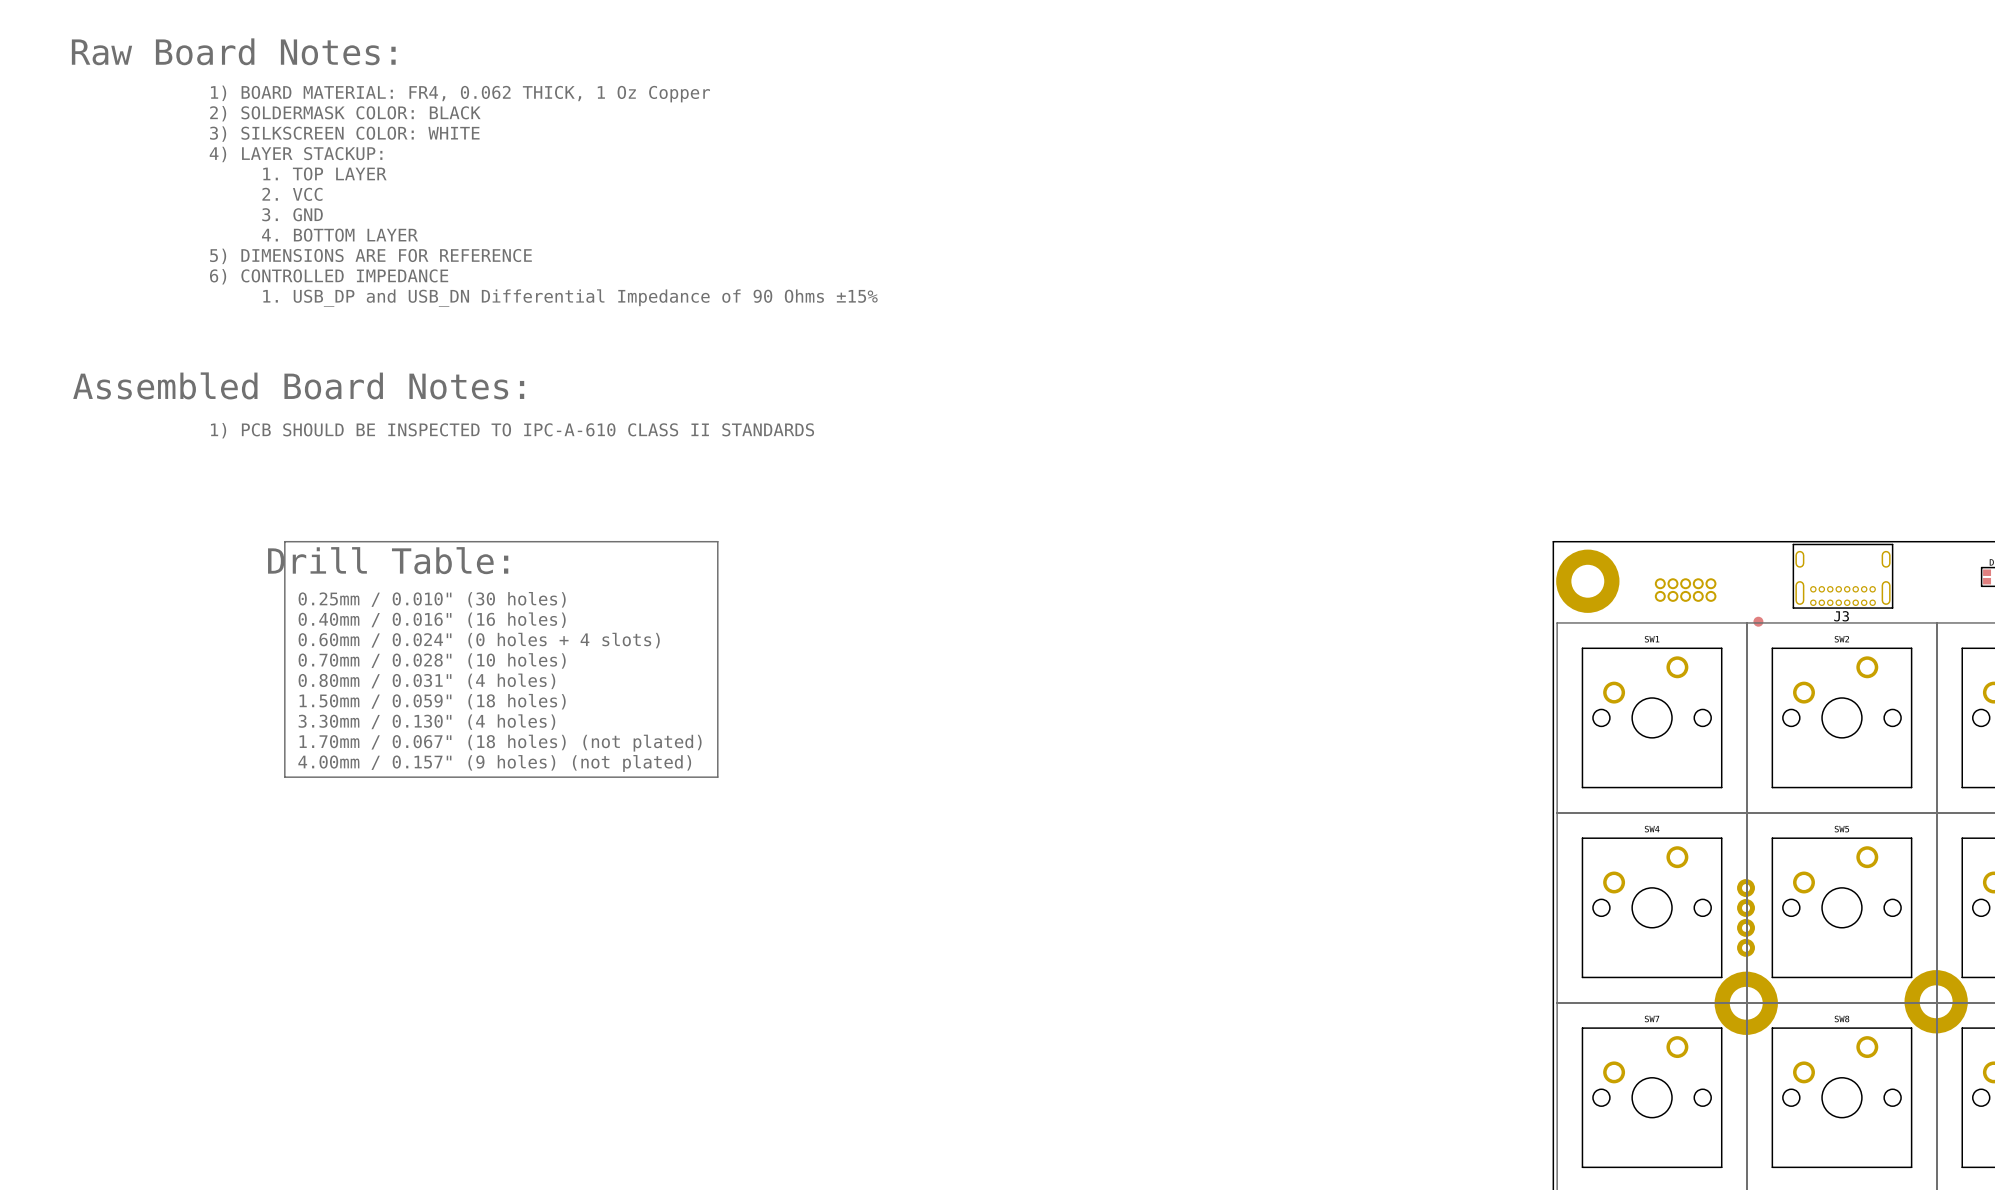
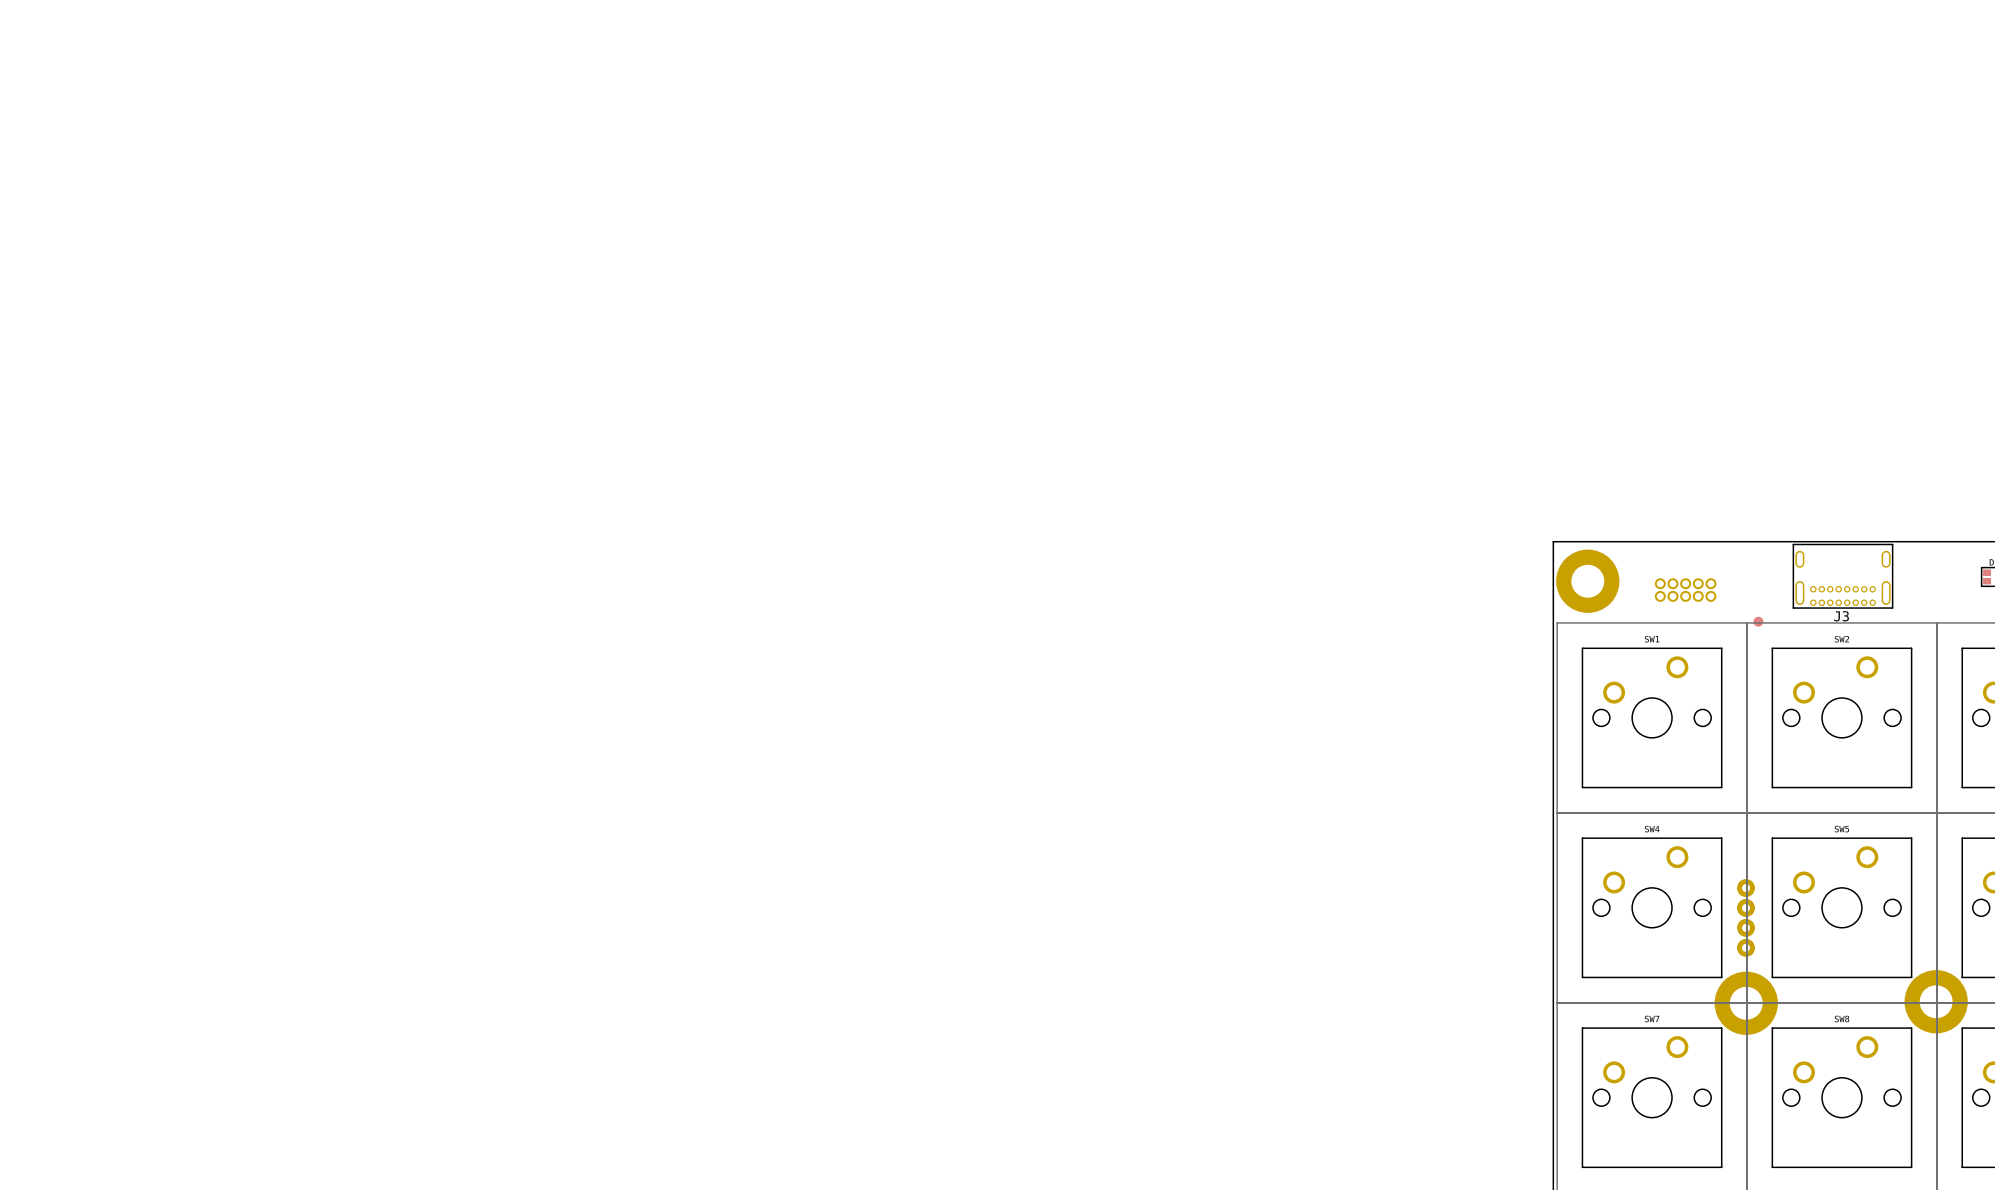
text: Raw Board Notes: (233, 51) -> none
text: 1) BOARD MATERIAL: FR4, 0.062 THICK, 1 Oz Copper (460, 93) -> none
text: 2) SOLDERMASK COLOR: BLACK (345, 113) -> none
text: 3) SILKSCREEN COLOR: WHITE (344, 134) -> none
text: 4) LAYER STACKUP: (296, 154) -> none
text: 1. TOP LAYER (324, 173) -> none
text: 2. VCC (292, 194) -> none
text: 3. GND (292, 214) -> none
text: 4. BOTTOM LAYER (339, 235) -> none
text: 5) DIMENSIONS ARE FOR REFERENCE (370, 256) -> none
text: 6) CONTROLLED IMPEDANCE (329, 276) -> none
text: 1. USB_DP and USB_DN Differential Impedance of 90 Ohms ±15% (570, 297) -> none
text: Assembled Board Notes: (298, 385) -> none
text: 1) PCB SHOULD BE INSPECTED TO IPC-A-610 CLASS II STANDARDS (512, 430) -> none
line: (284, 541) (284, 777) (717, 777) (717, 541) (284, 541) -> none
text: Drill Table: (388, 560) -> none
text: 0.25mm / 0.010" (30 holes) (432, 599) -> none
text: 0.40mm / 0.016" (16 holes) (432, 620) -> none
text: 0.60mm / 0.024" (0 holes + 4 slots) (479, 640) -> none
text: 0.70mm / 0.028" (10 holes) (432, 660) -> none
text: 0.80mm / 0.031" (4 holes) (426, 681) -> none
text: 1.50mm / 0.059" (18 holes) (432, 701) -> none
text: 3.30mm / 0.130" (4 holes) (426, 722) -> none
text: 1.70mm / 0.067" (18 holes) (not plated) (500, 743) -> none
text: 4.00mm / 0.157" (9 holes) (not plated) (494, 763) -> none

